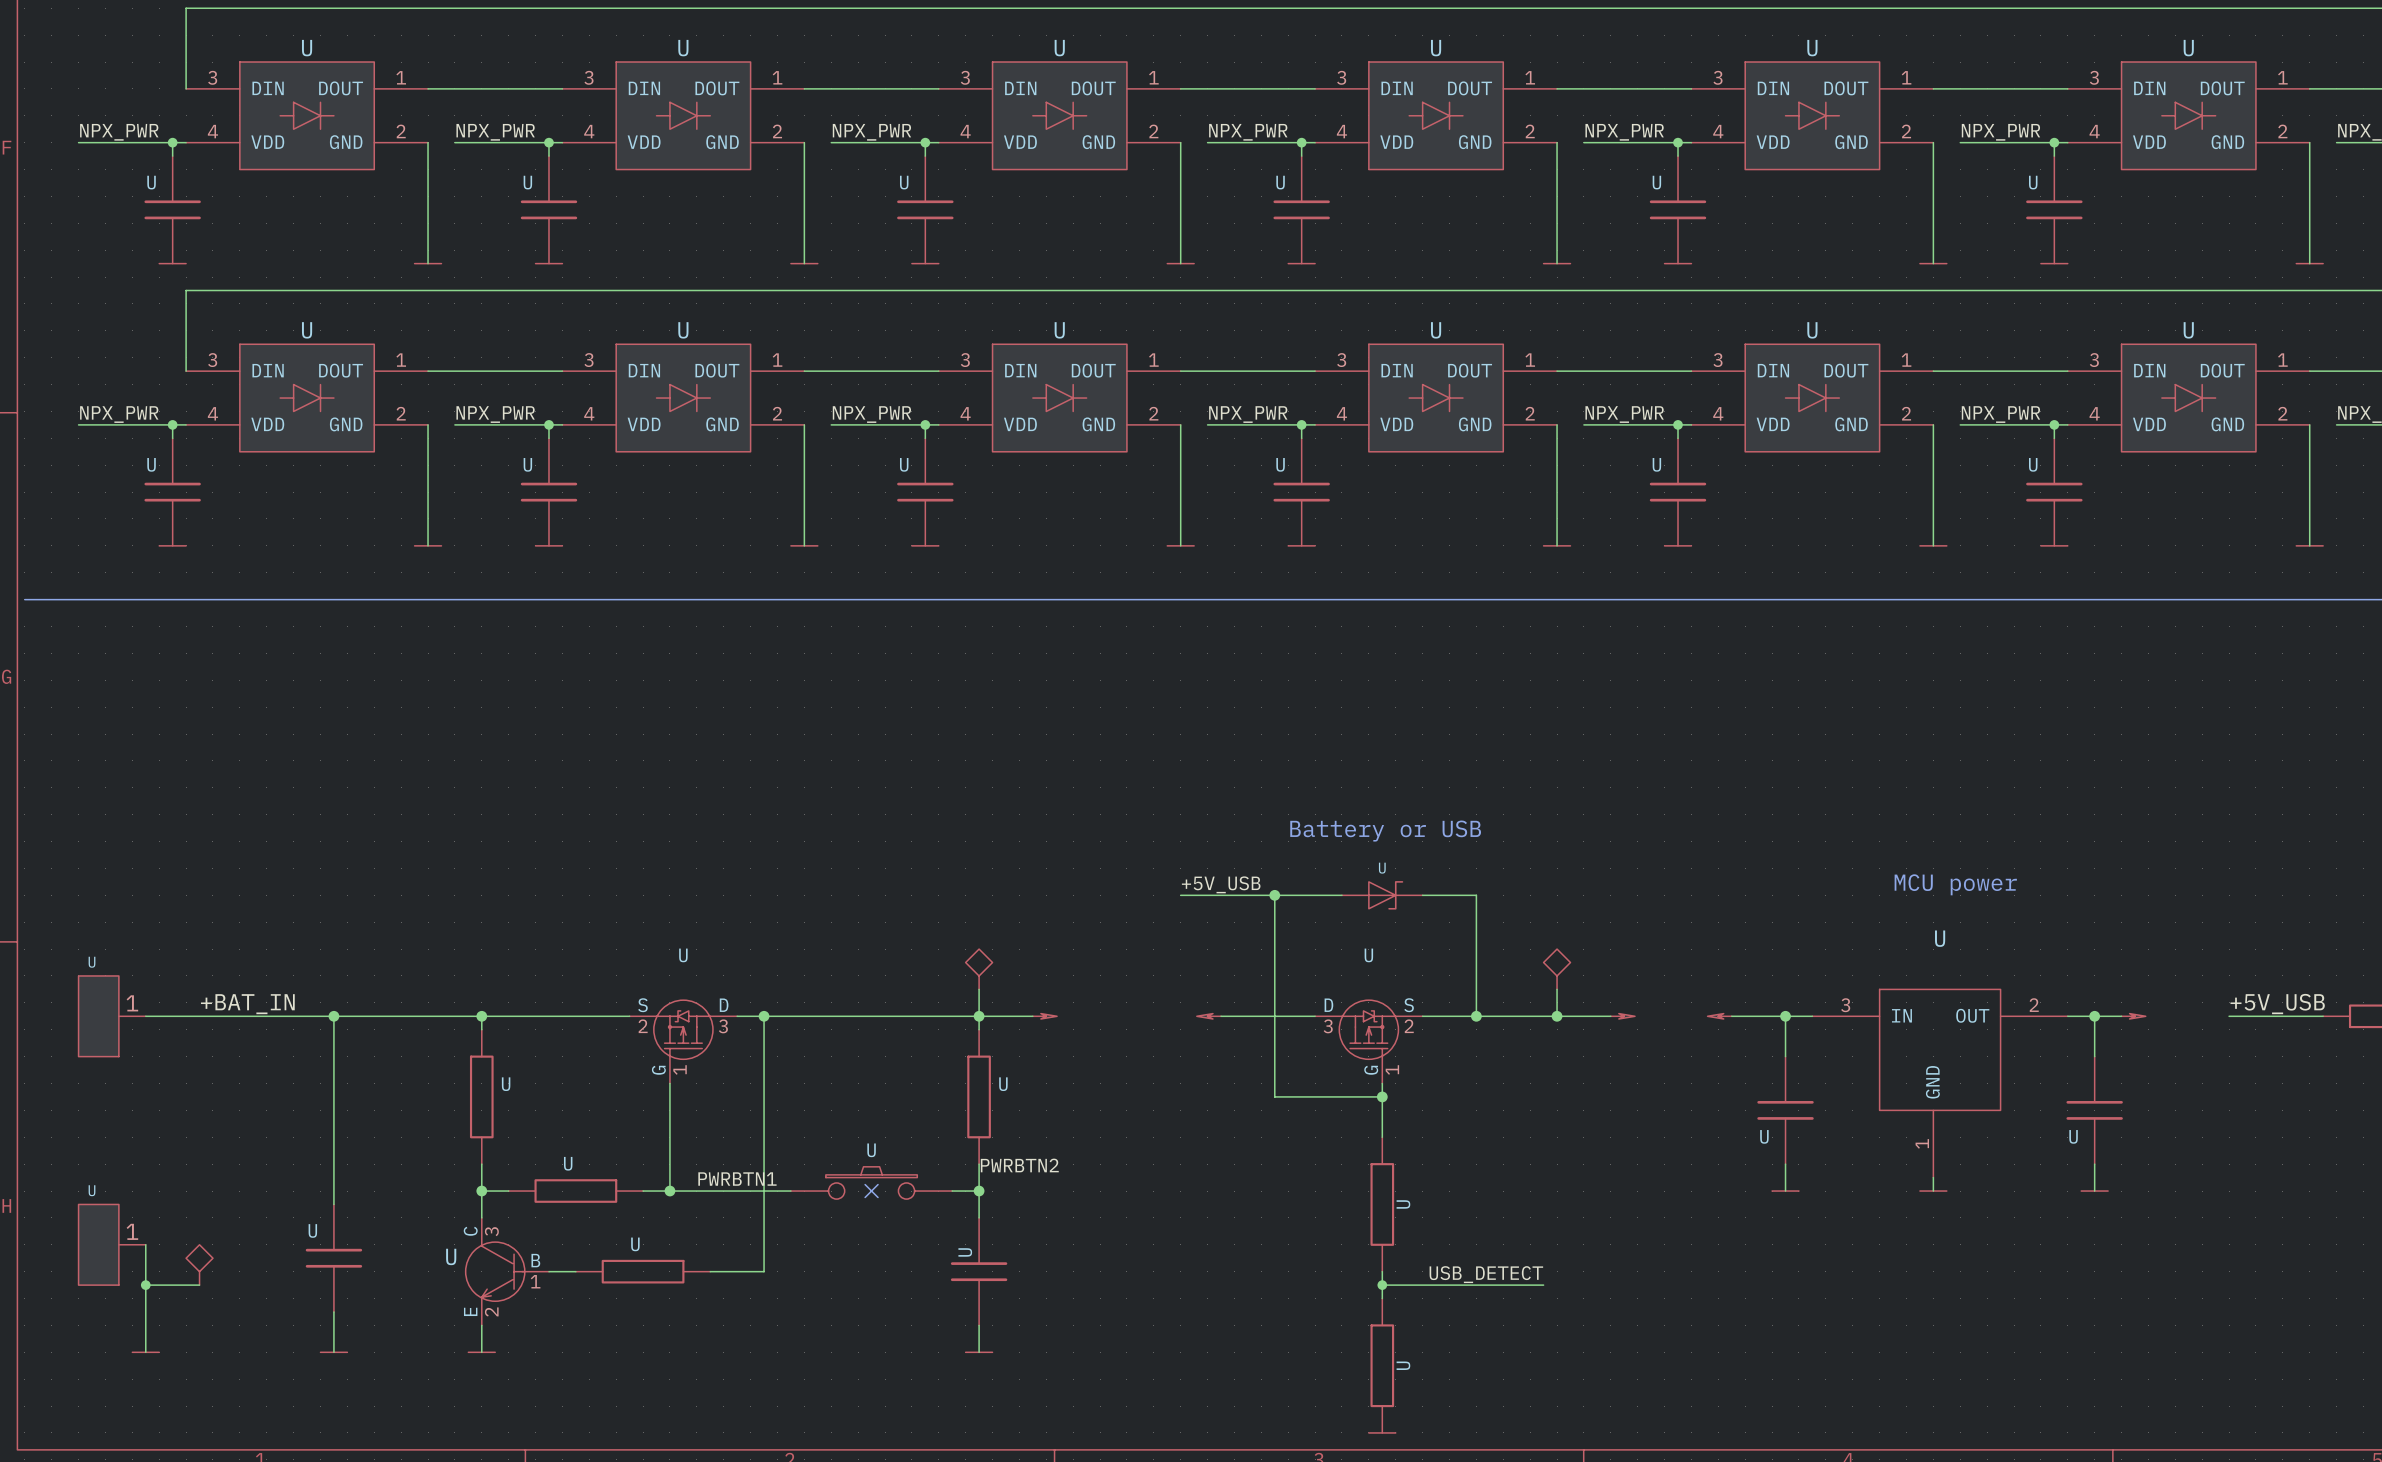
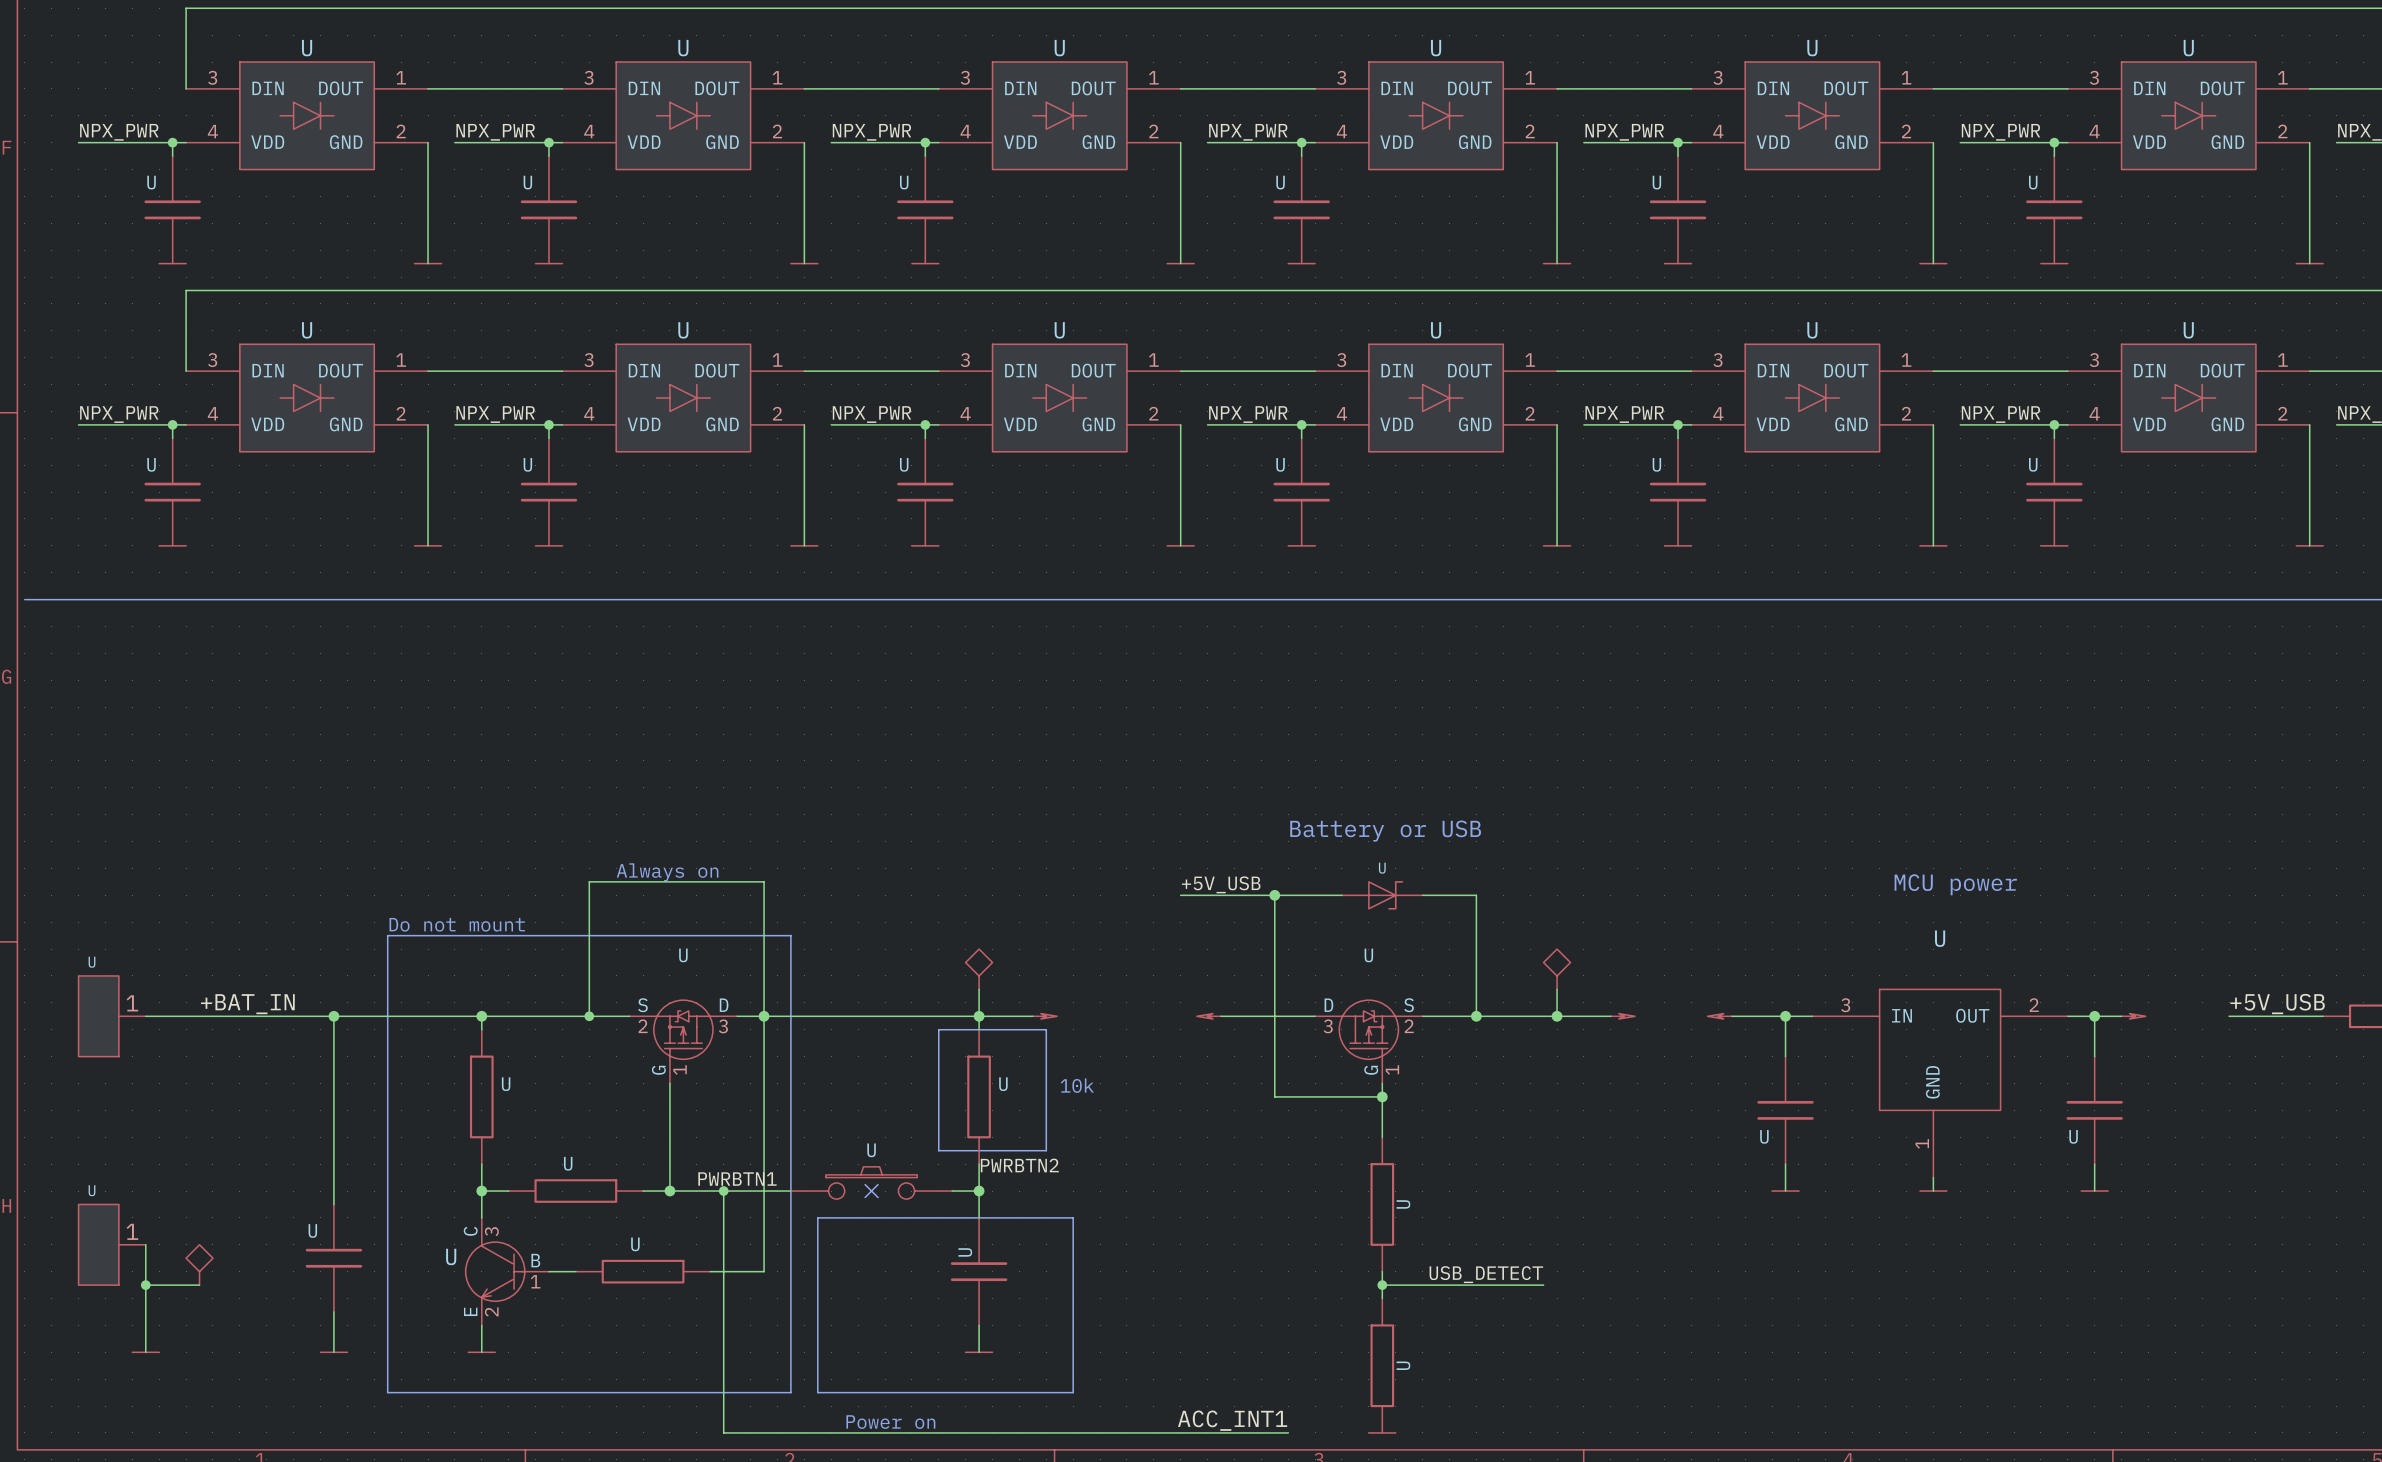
text: none -> Always on (667, 872)
text: none -> Do not mount (457, 924)
line: none -> (387, 935) (790, 935) (790, 1392) (387, 1392) (387, 935)
wire: none -> (589, 1016) (589, 881) (764, 881) (764, 1016)
junction: none -> (589, 1016)
line: none -> (938, 1029) (1046, 1029) (1046, 1150) (938, 1150) (938, 1029)
text: none -> 10k (1077, 1085)
wire: none -> (723, 1191) (723, 1432) (1288, 1432)
junction: none -> (723, 1191)
line: none -> (817, 1217) (1073, 1217) (1073, 1392) (817, 1392) (817, 1217)
label: none -> ACC_INT1 (1232, 1420)
text: none -> Power on (890, 1422)

